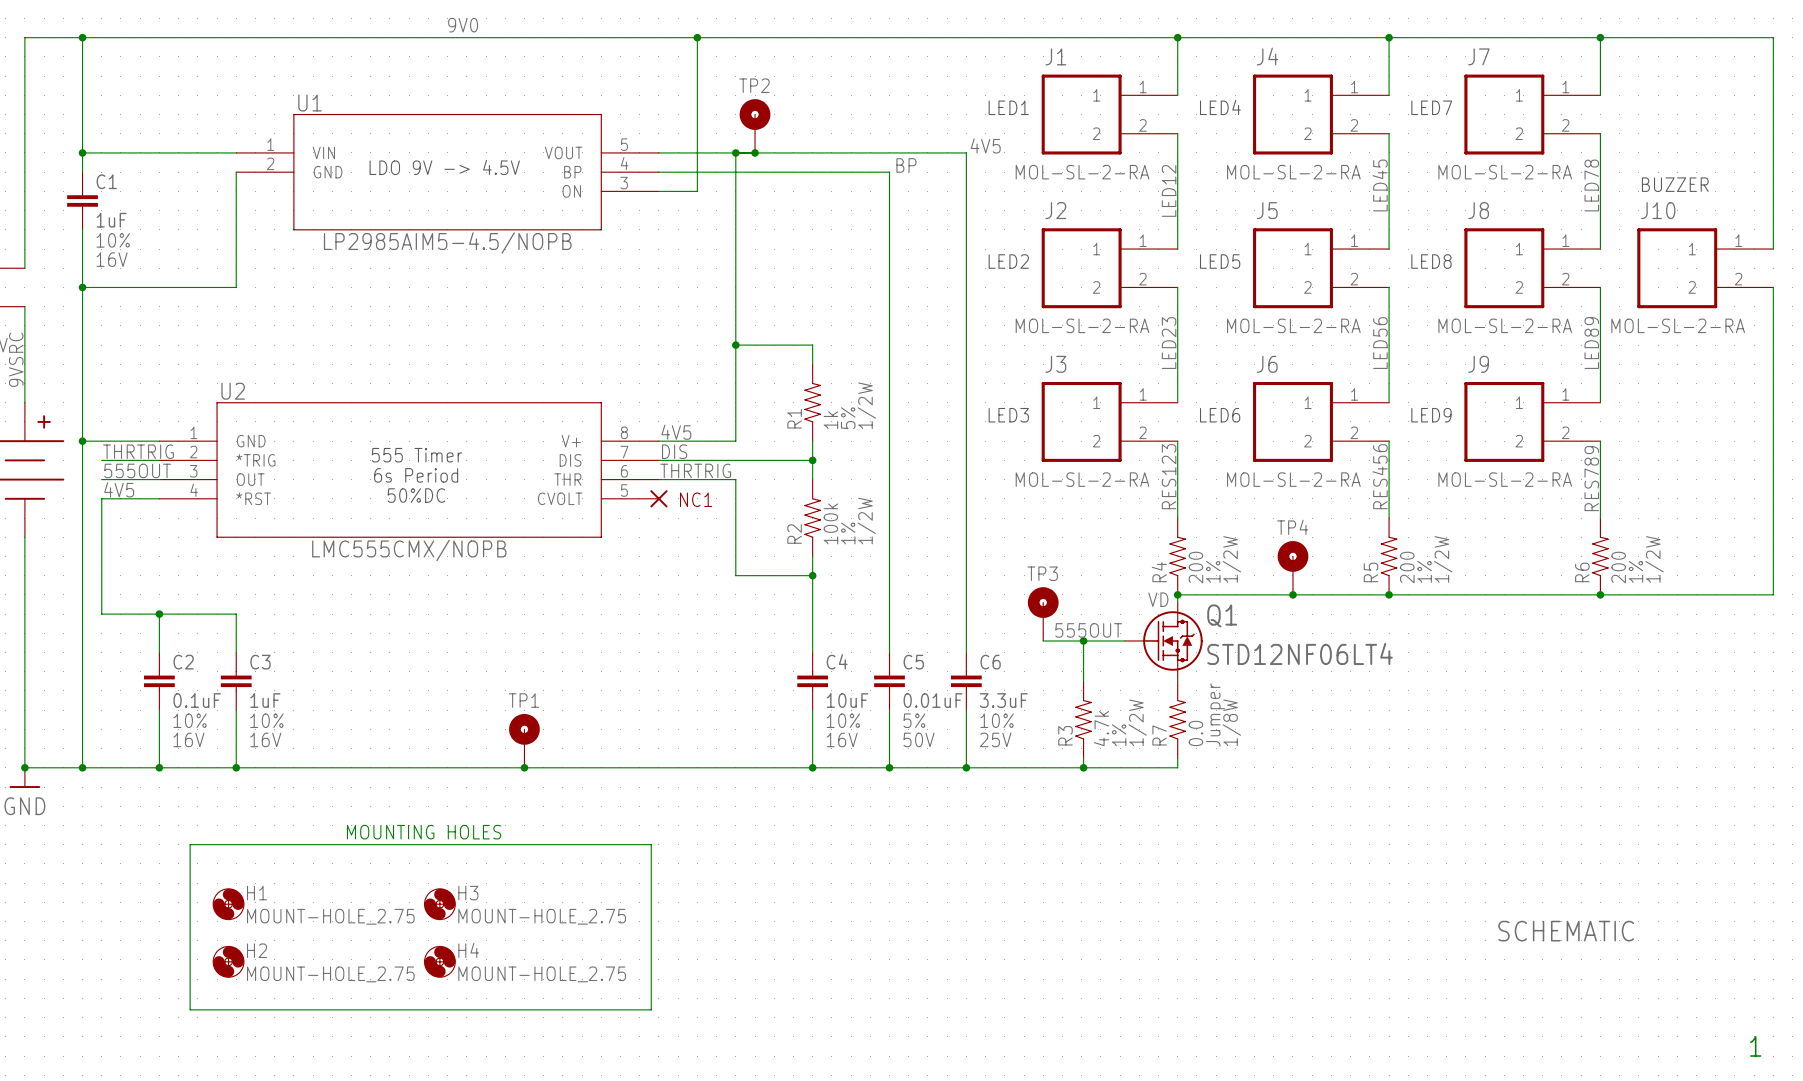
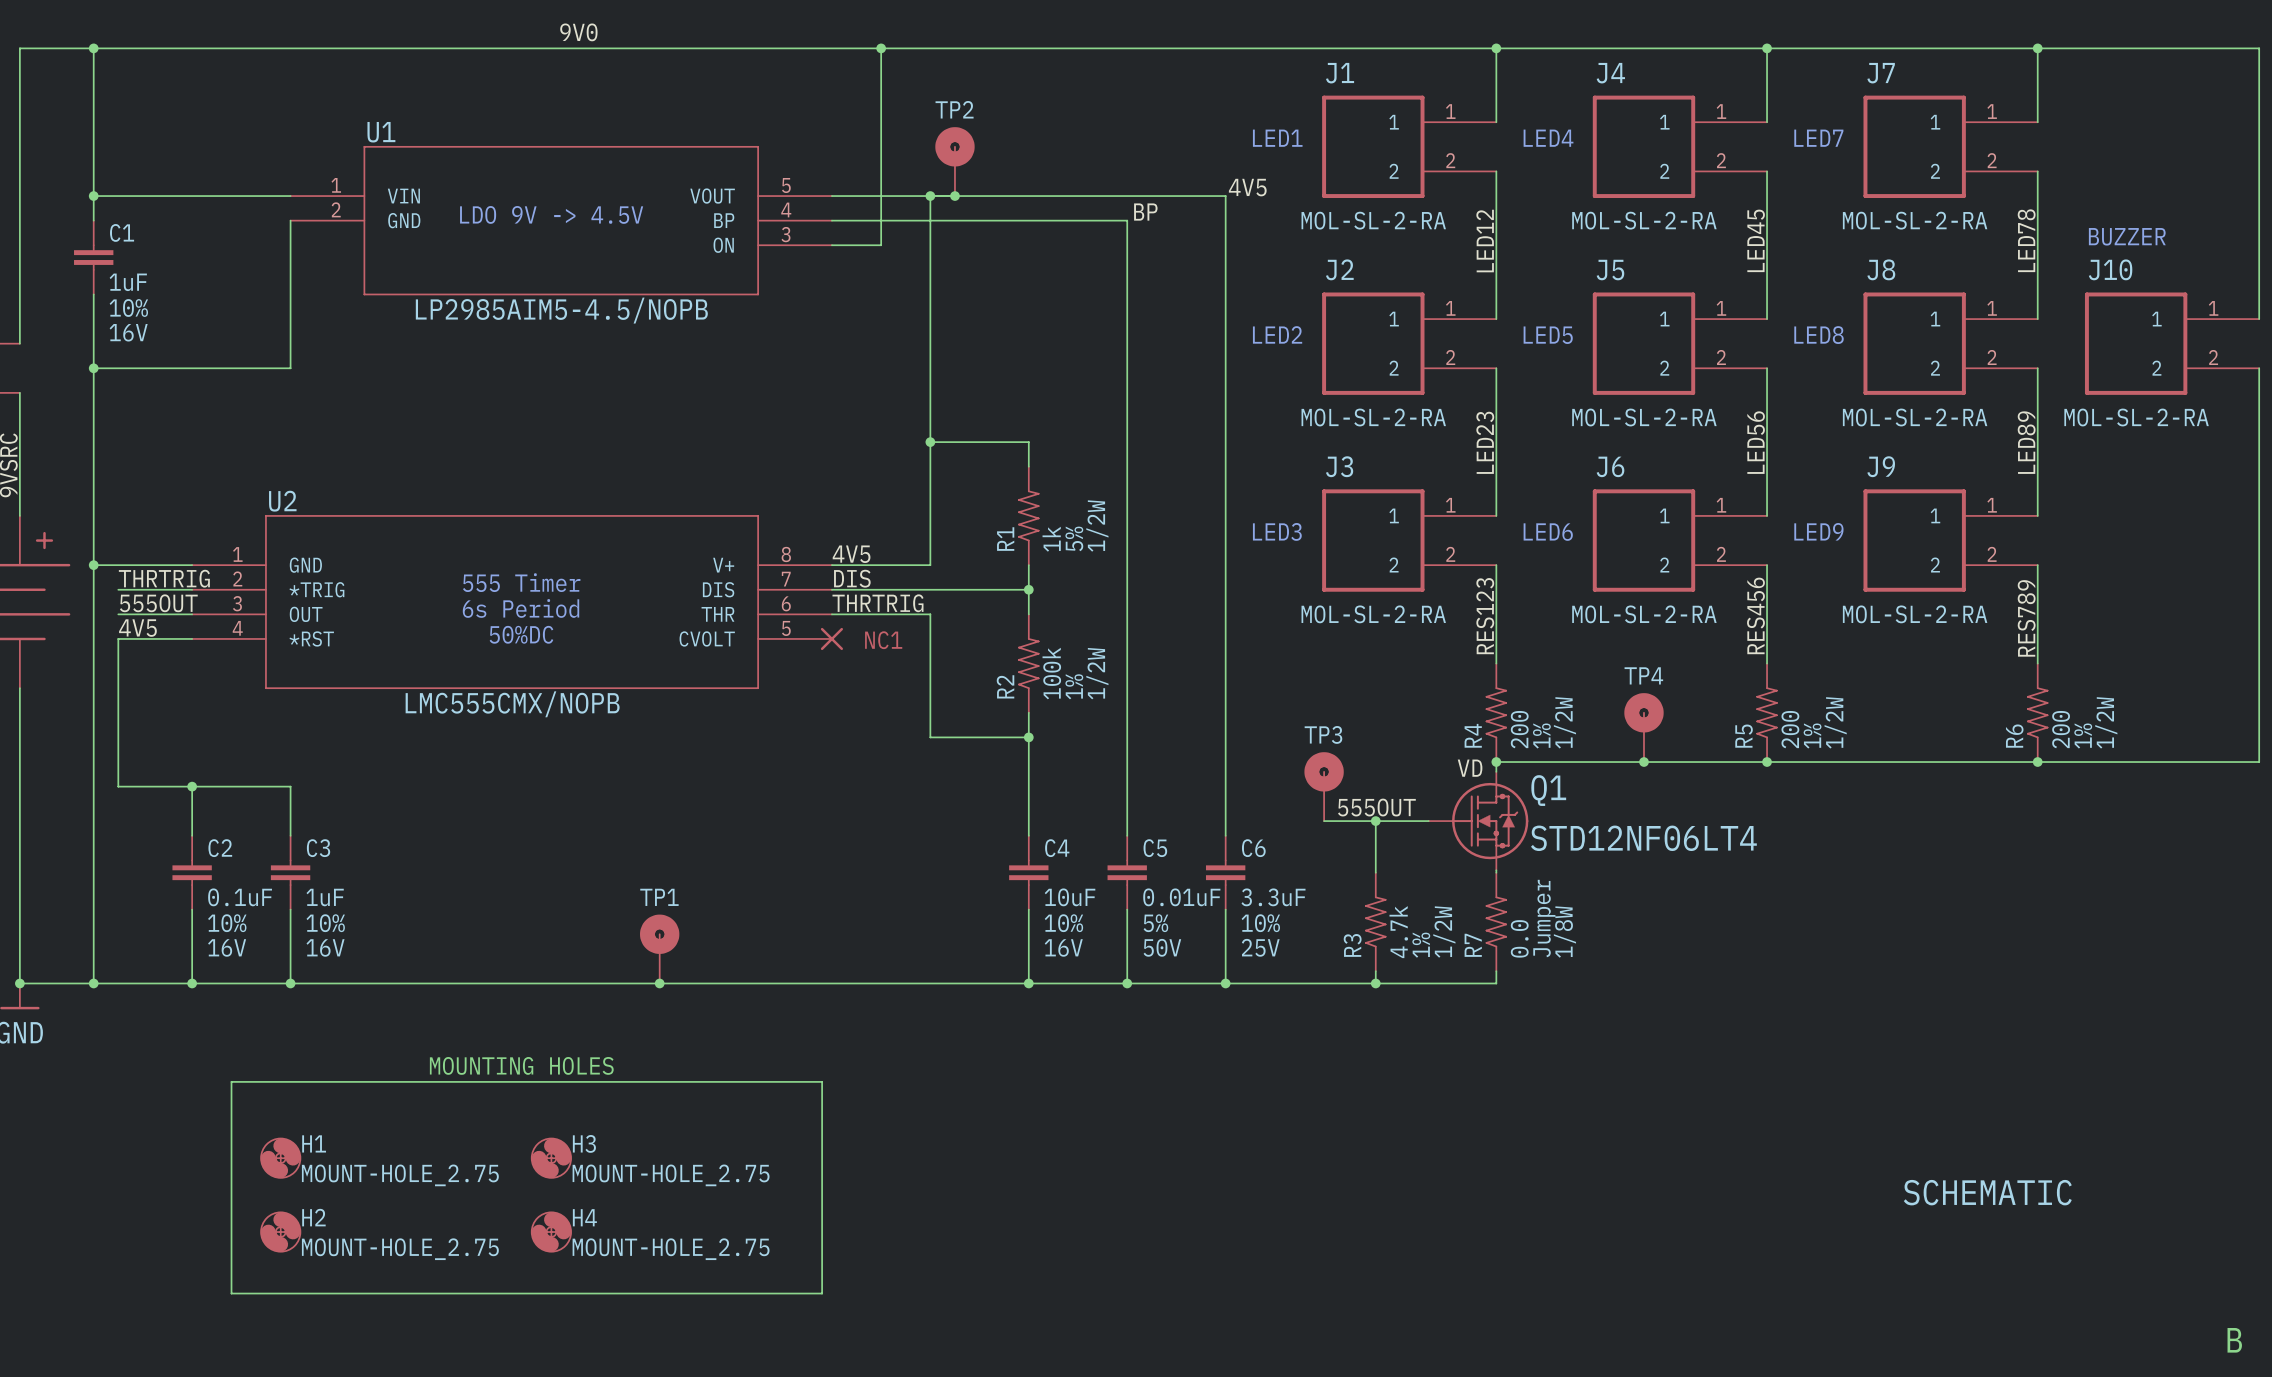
text: 1 (1755, 1046) -> B (2234, 1340)

